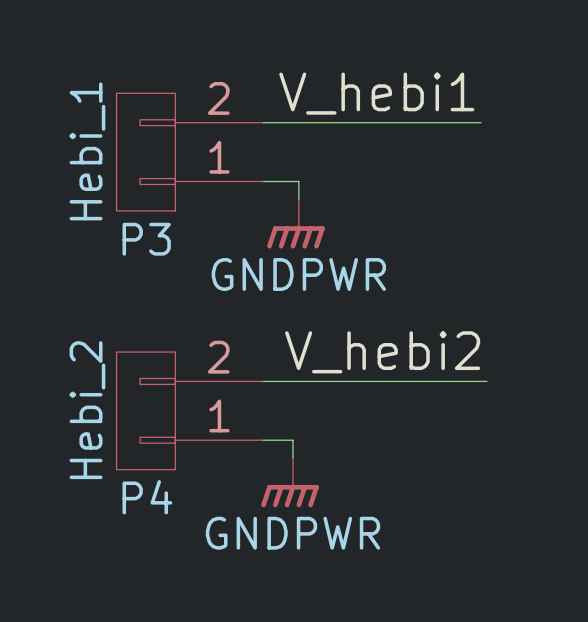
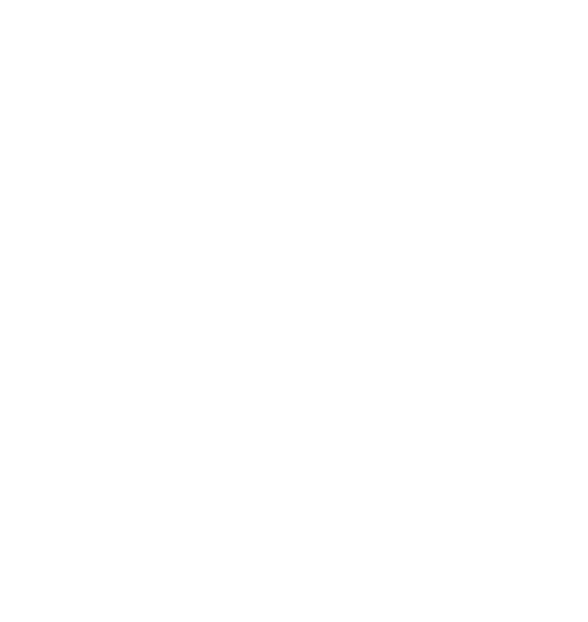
label: V_hebi1 (376, 93) -> none
wire: (263, 122) (481, 122) -> none
P3: Hebi_1 (190, 152) -> none
wire: (263, 181) (298, 181) (298, 199) -> none
power symbol: GNDPWR (295, 223) -> none
label: V_hebi2 (382, 352) -> none
wire: (263, 381) (487, 381) -> none
P4: Hebi_2 (190, 410) -> none
wire: (263, 440) (292, 440) (292, 457) -> none
power symbol: GNDPWR (290, 482) -> none

